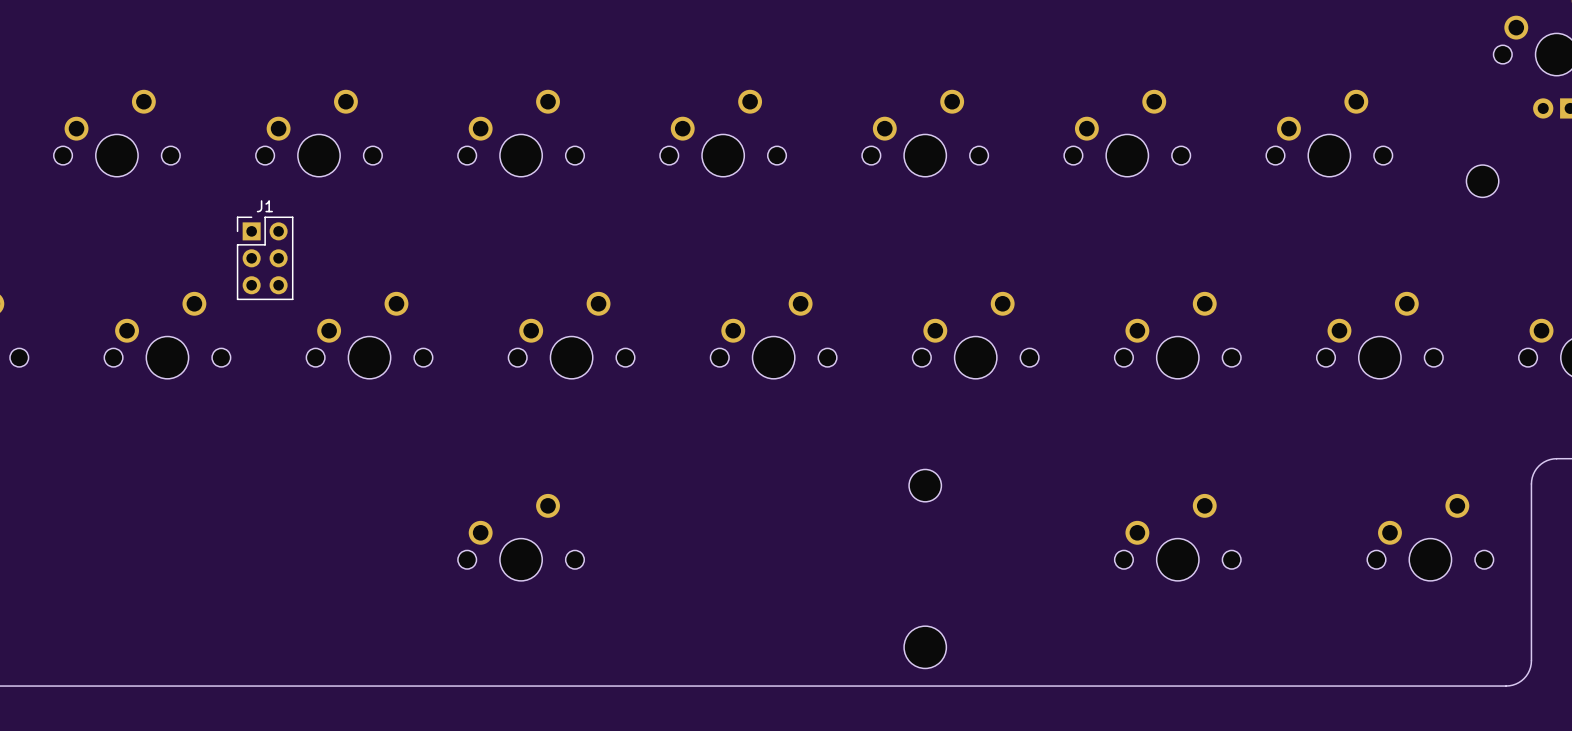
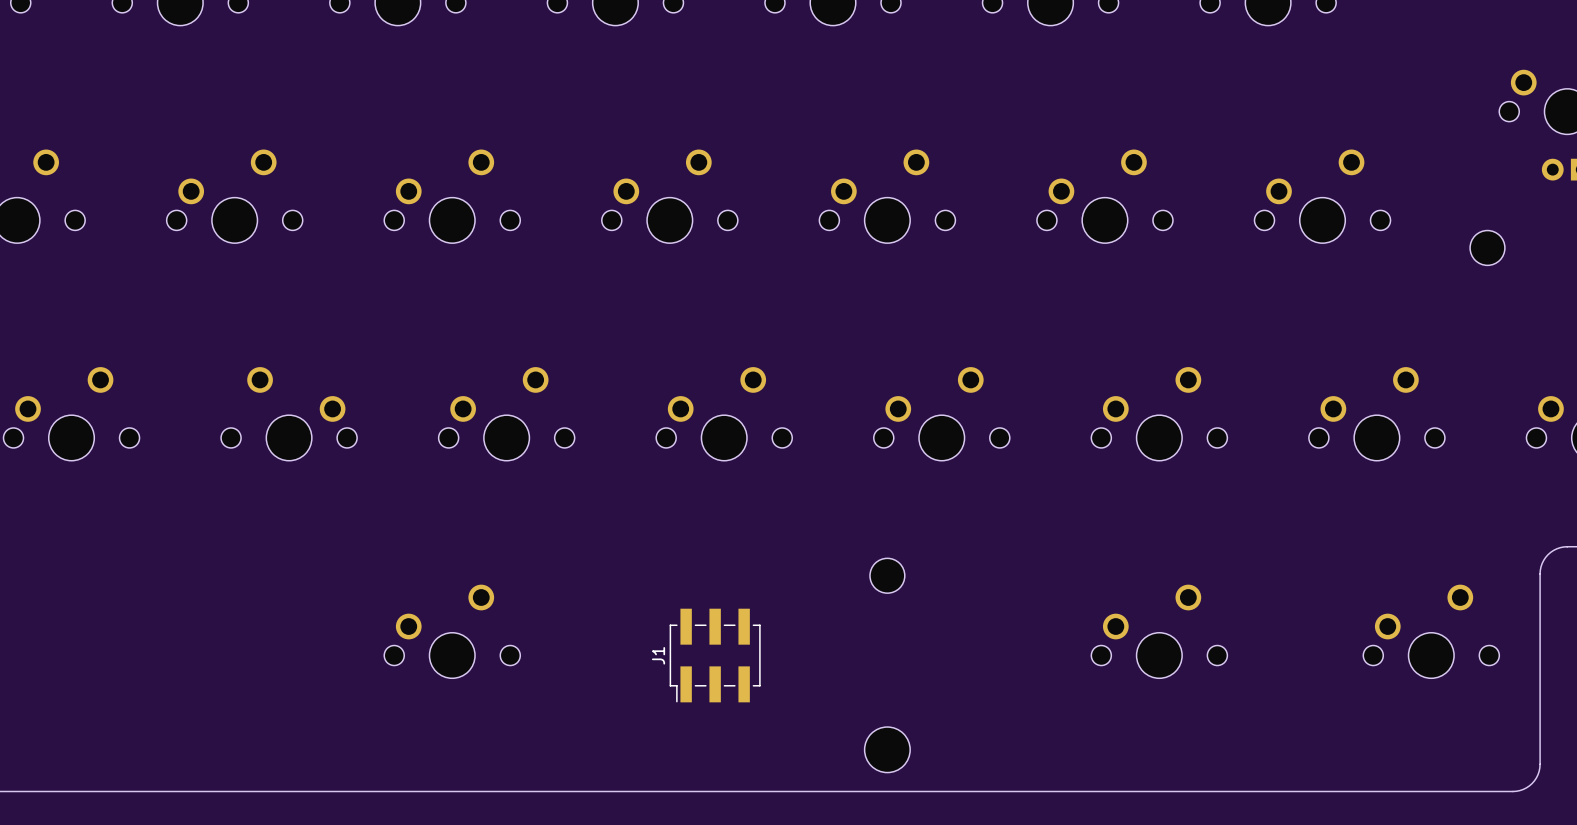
J1 name position: J1 (264, 206) -> J1 (658, 655)
J1 footprint: [236, 216, 294, 301] -> [669, 608, 761, 703]
part side: top (369, 335) -> bottom (289, 413)

